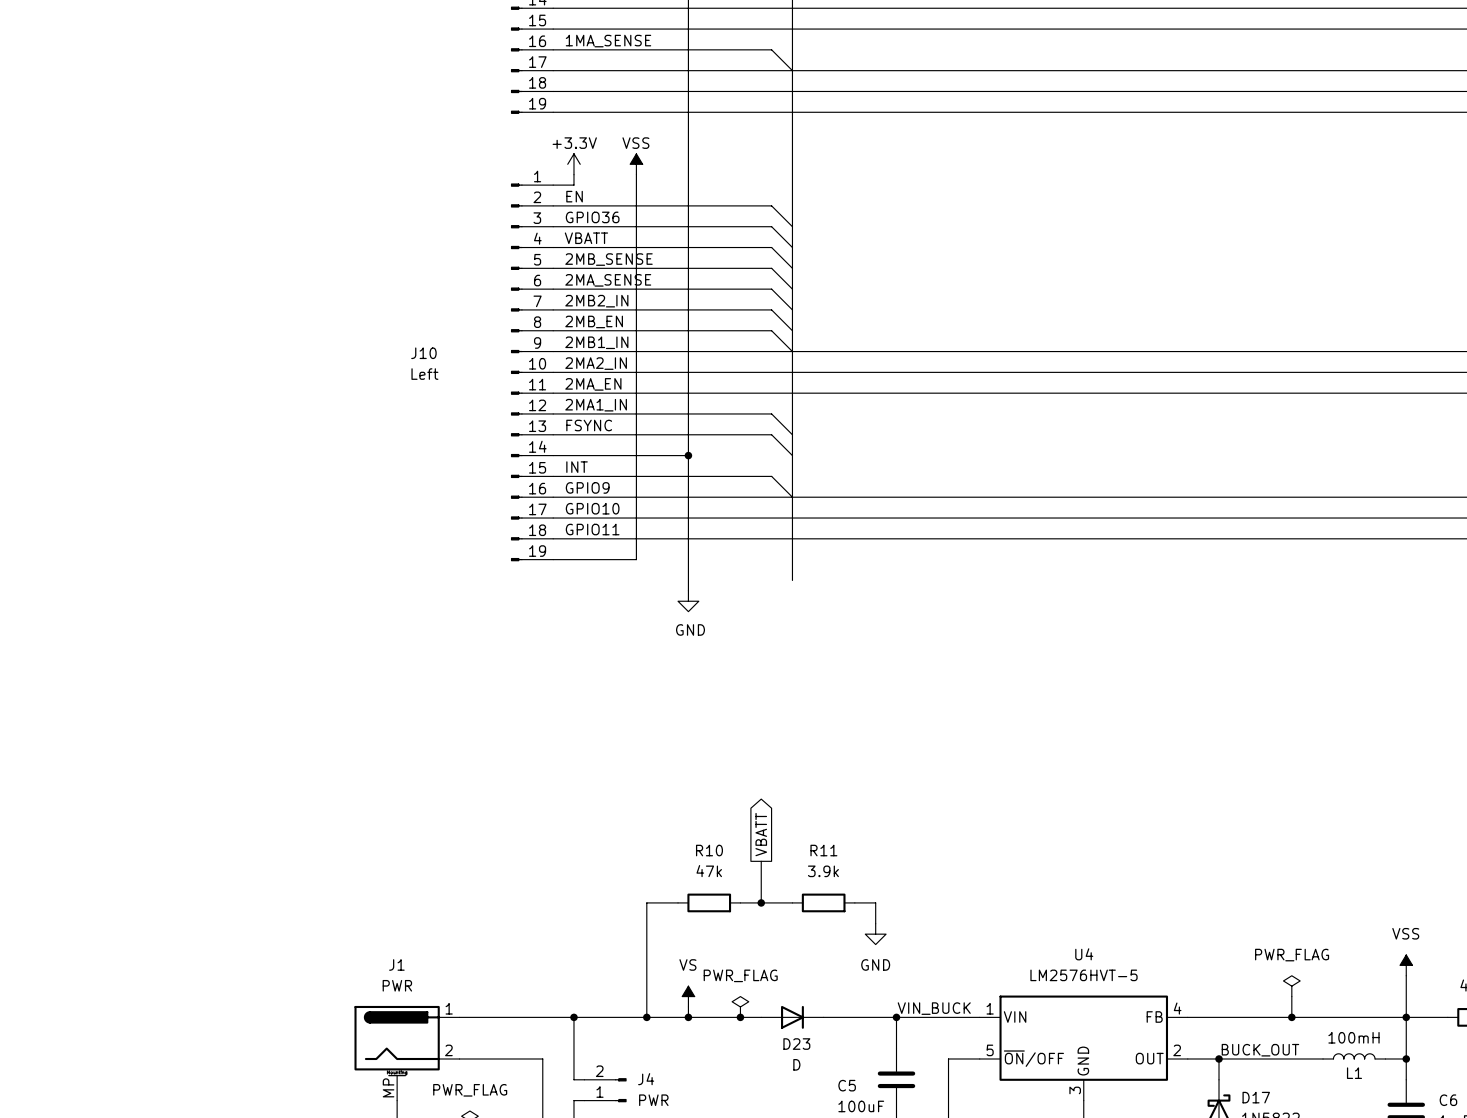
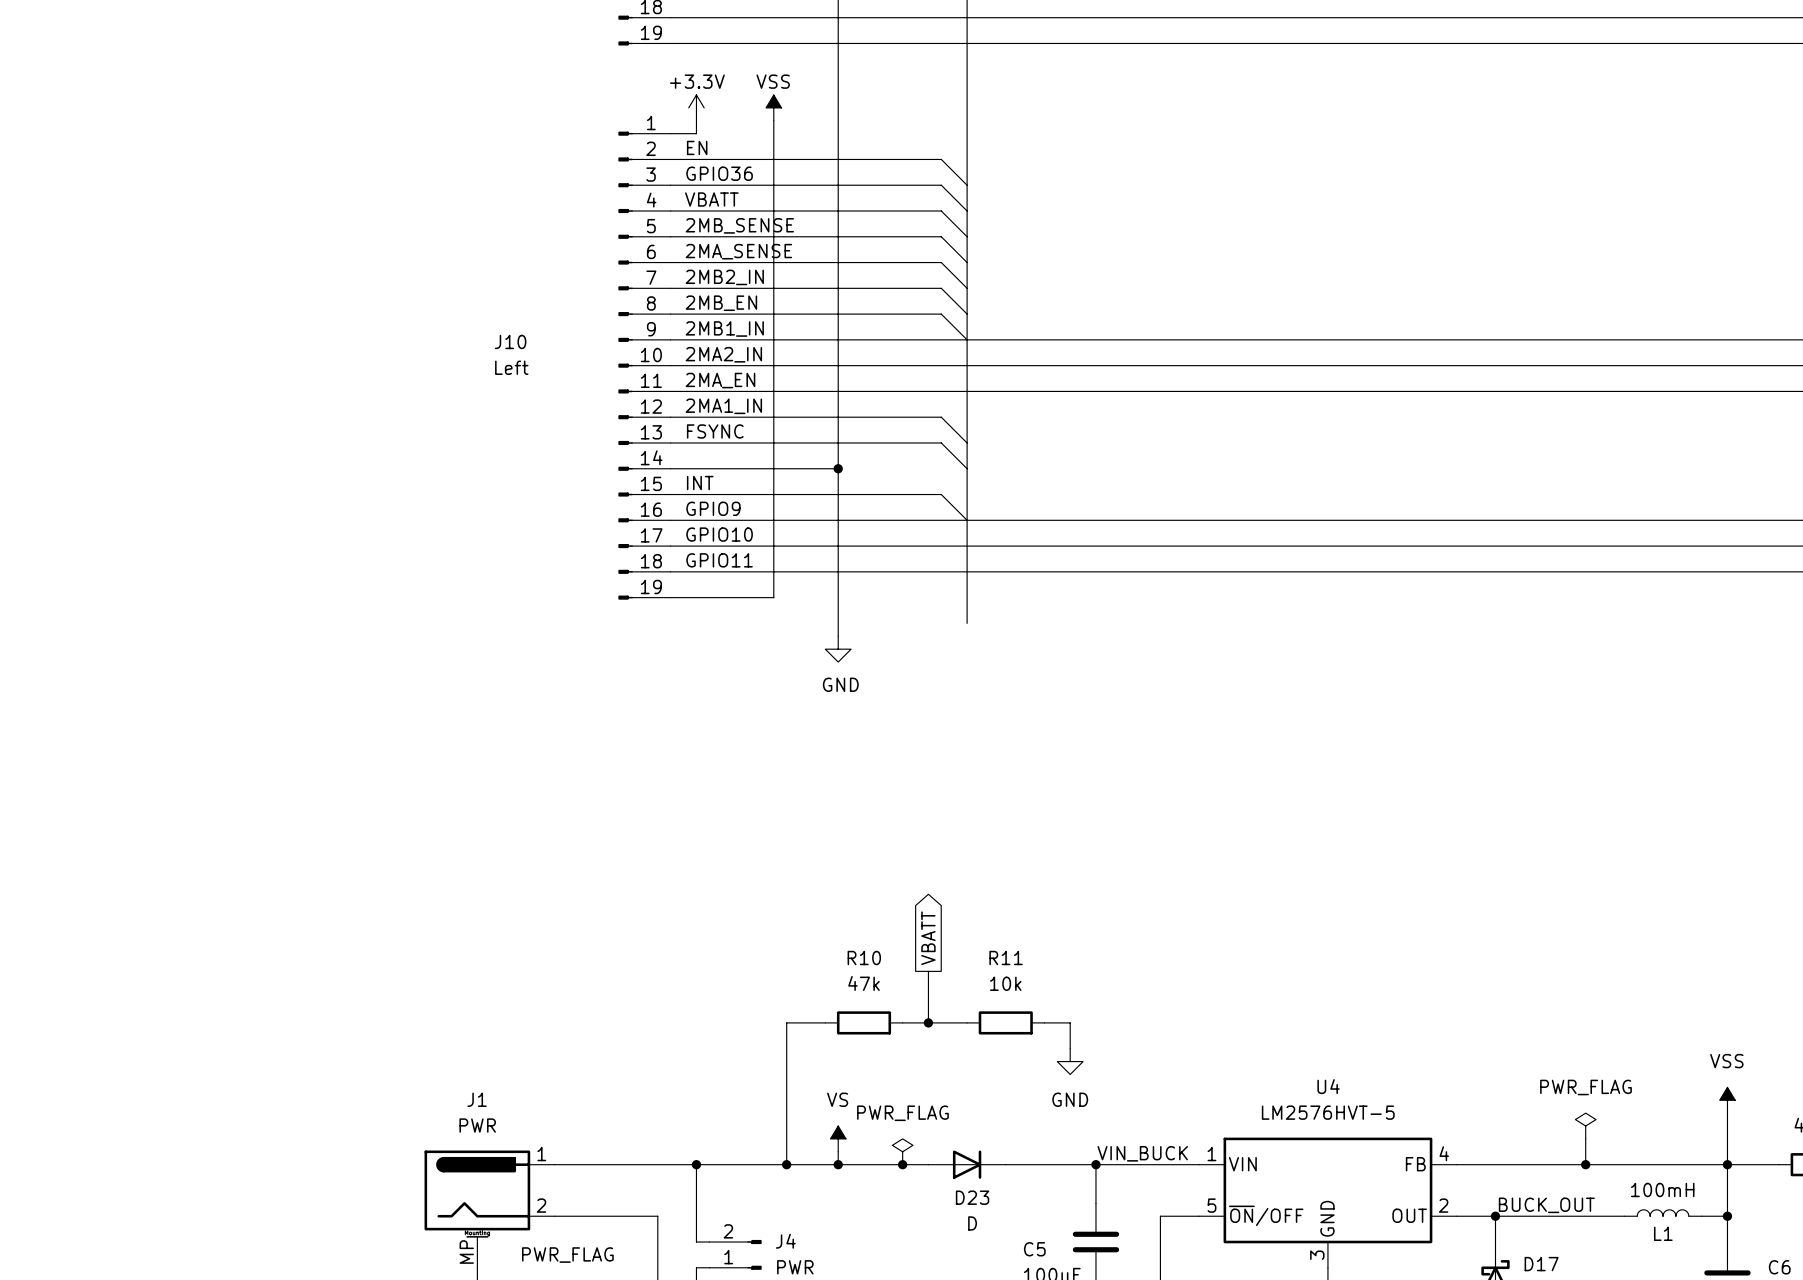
R11 value: 3.9k (823, 871) -> 10k (1005, 983)

